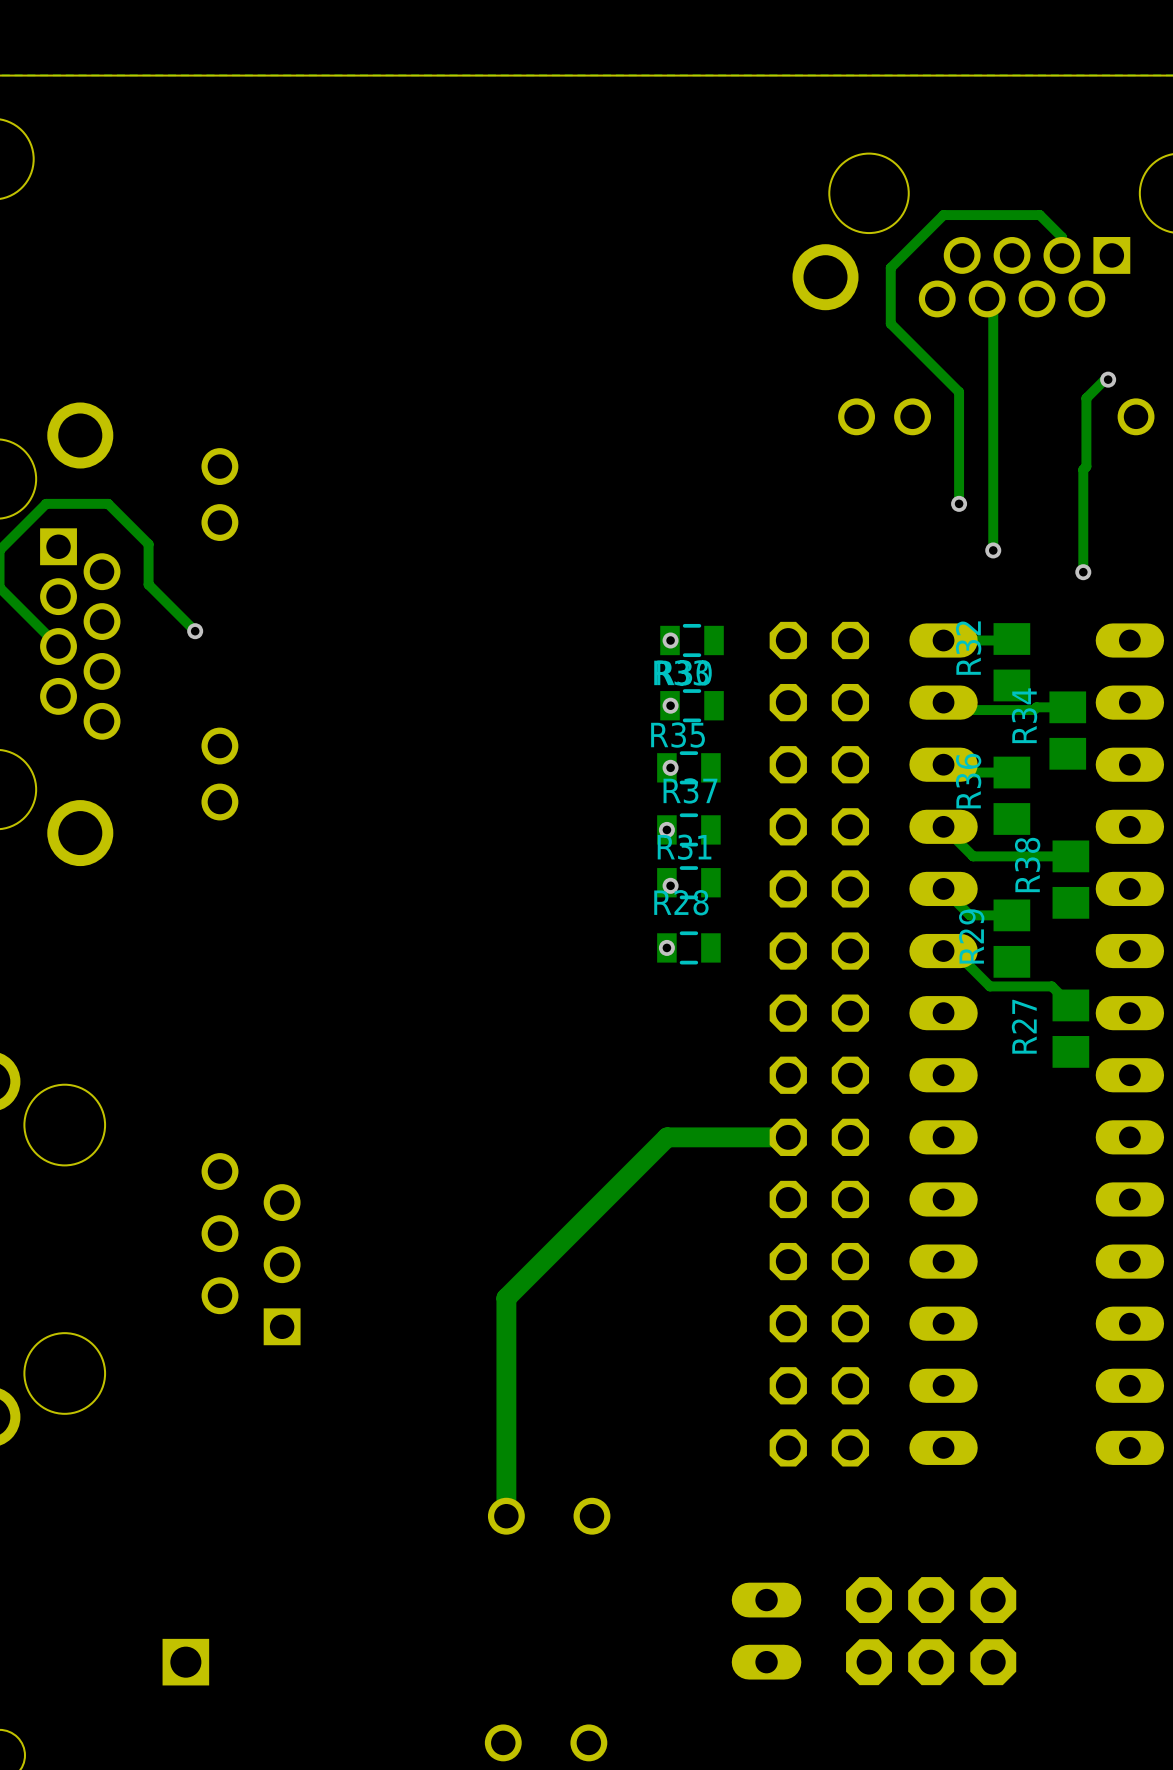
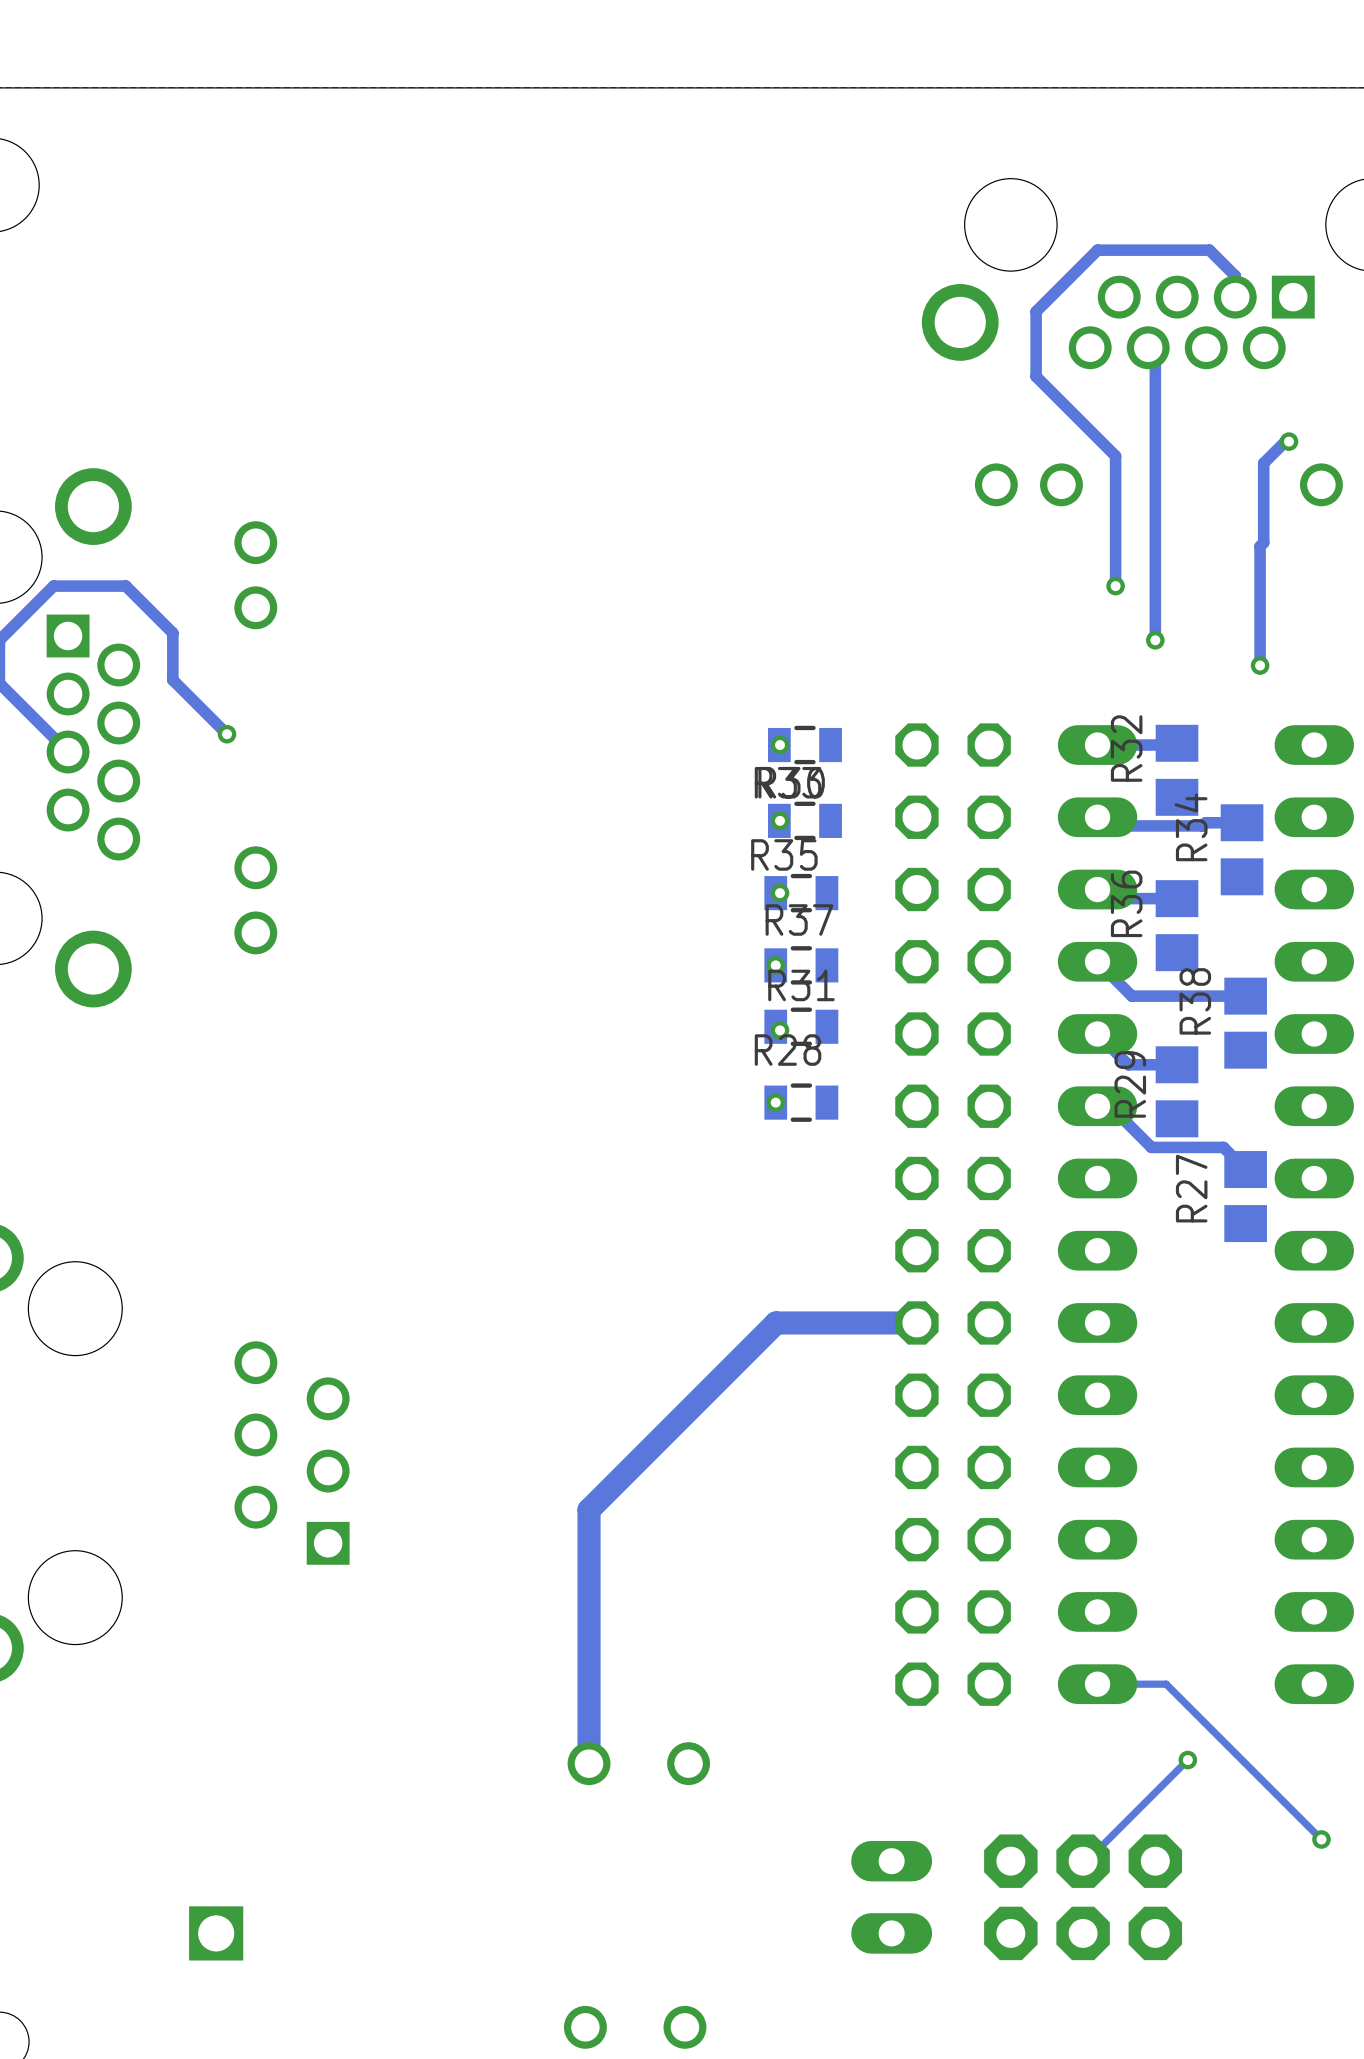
track: none -> (1097, 1684) (1166, 1684) (1317, 1835) (1321, 1835) (1321, 1839)
track: none -> (1187, 1760) (1086, 1861) (1083, 1861)
via: none -> (1187, 1760)
via: none -> (1321, 1839)

